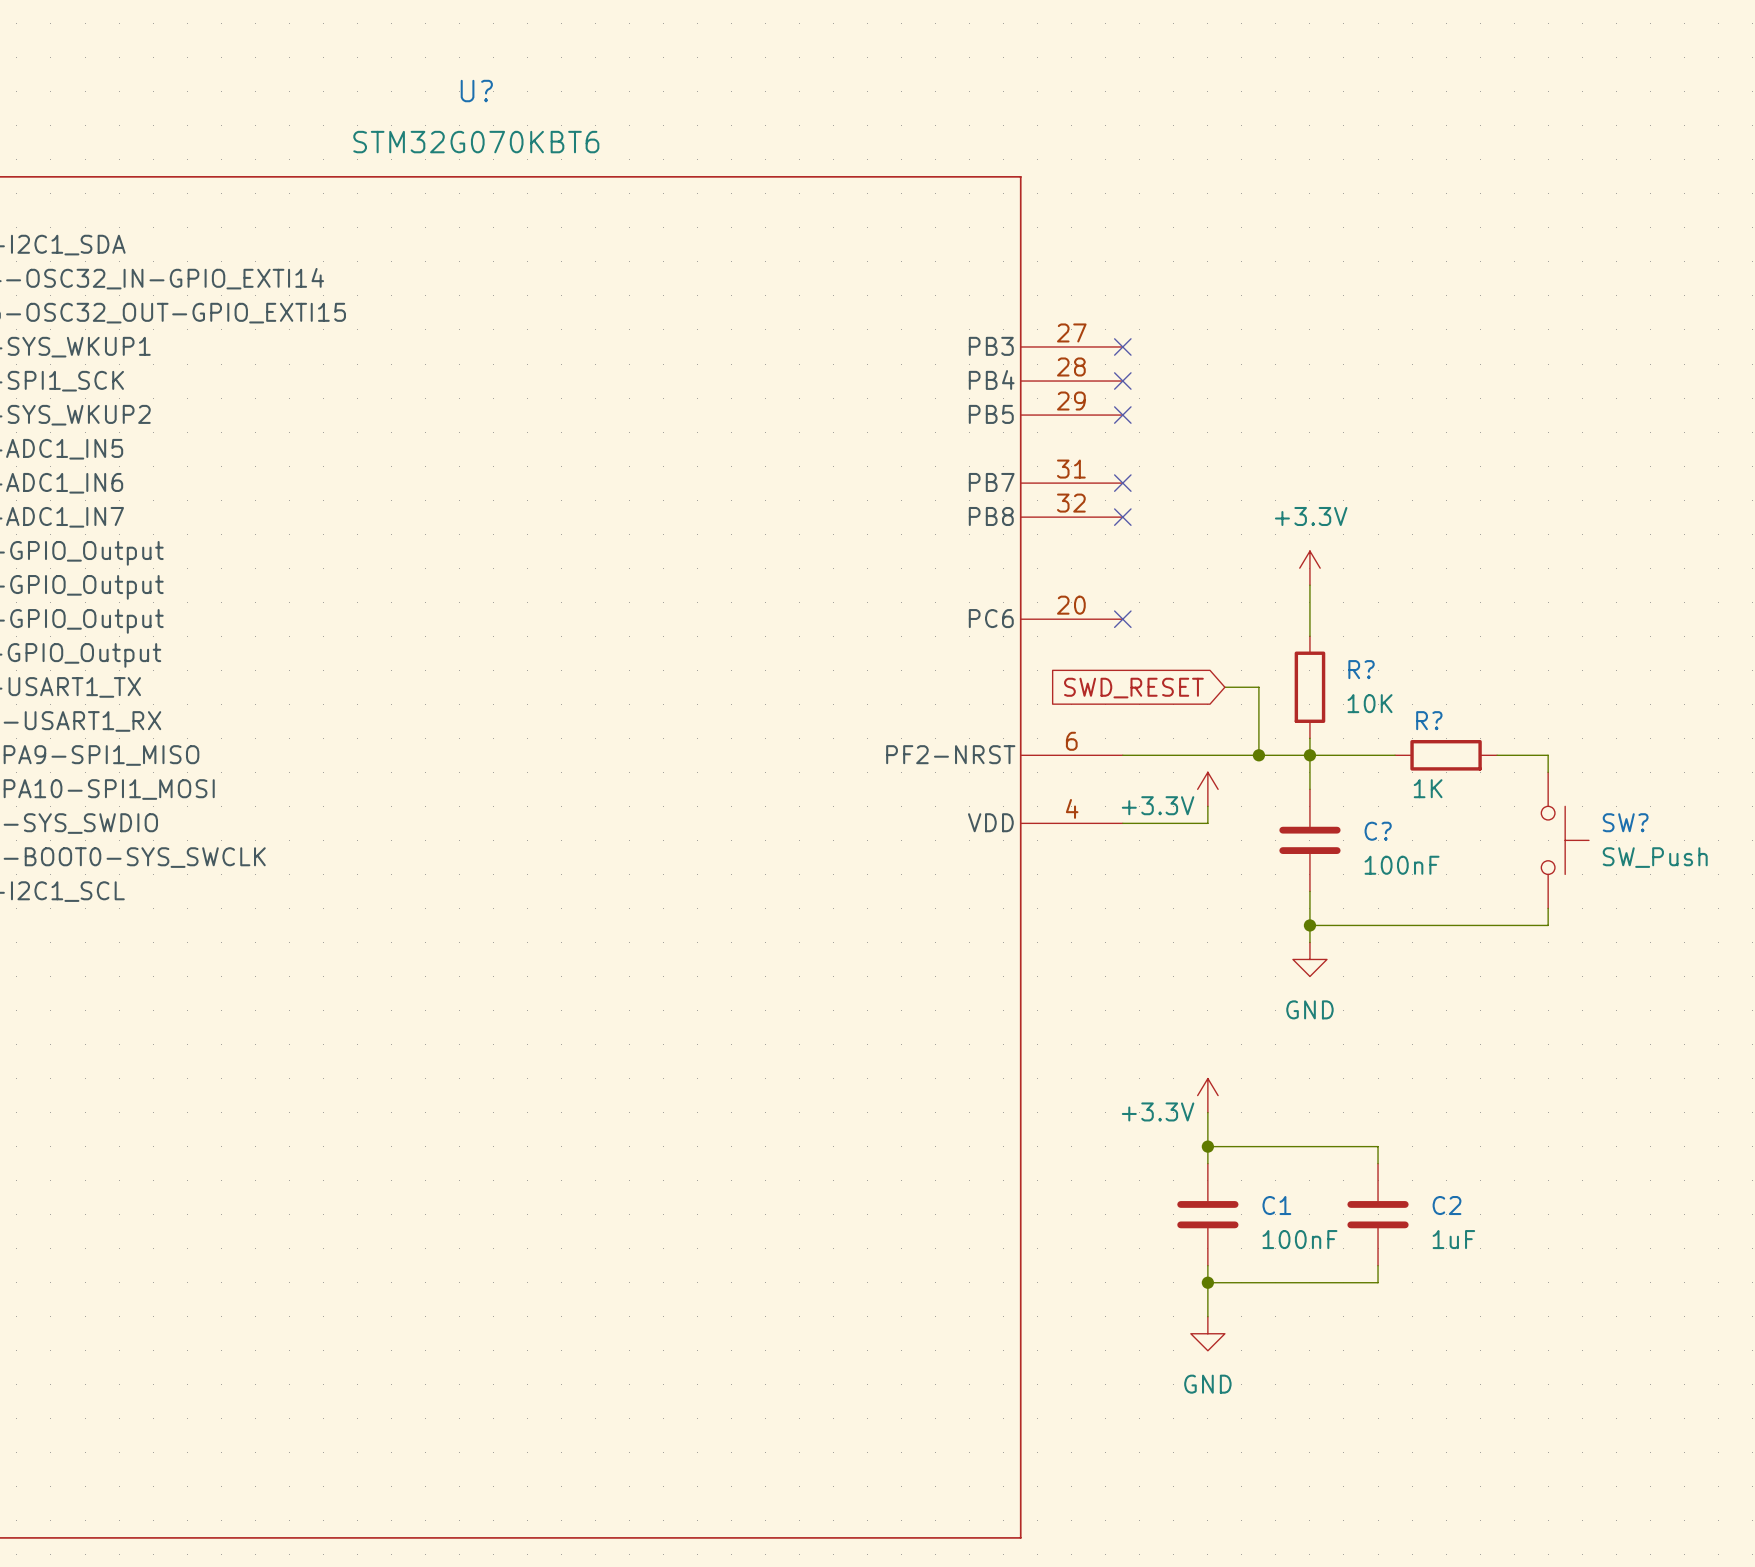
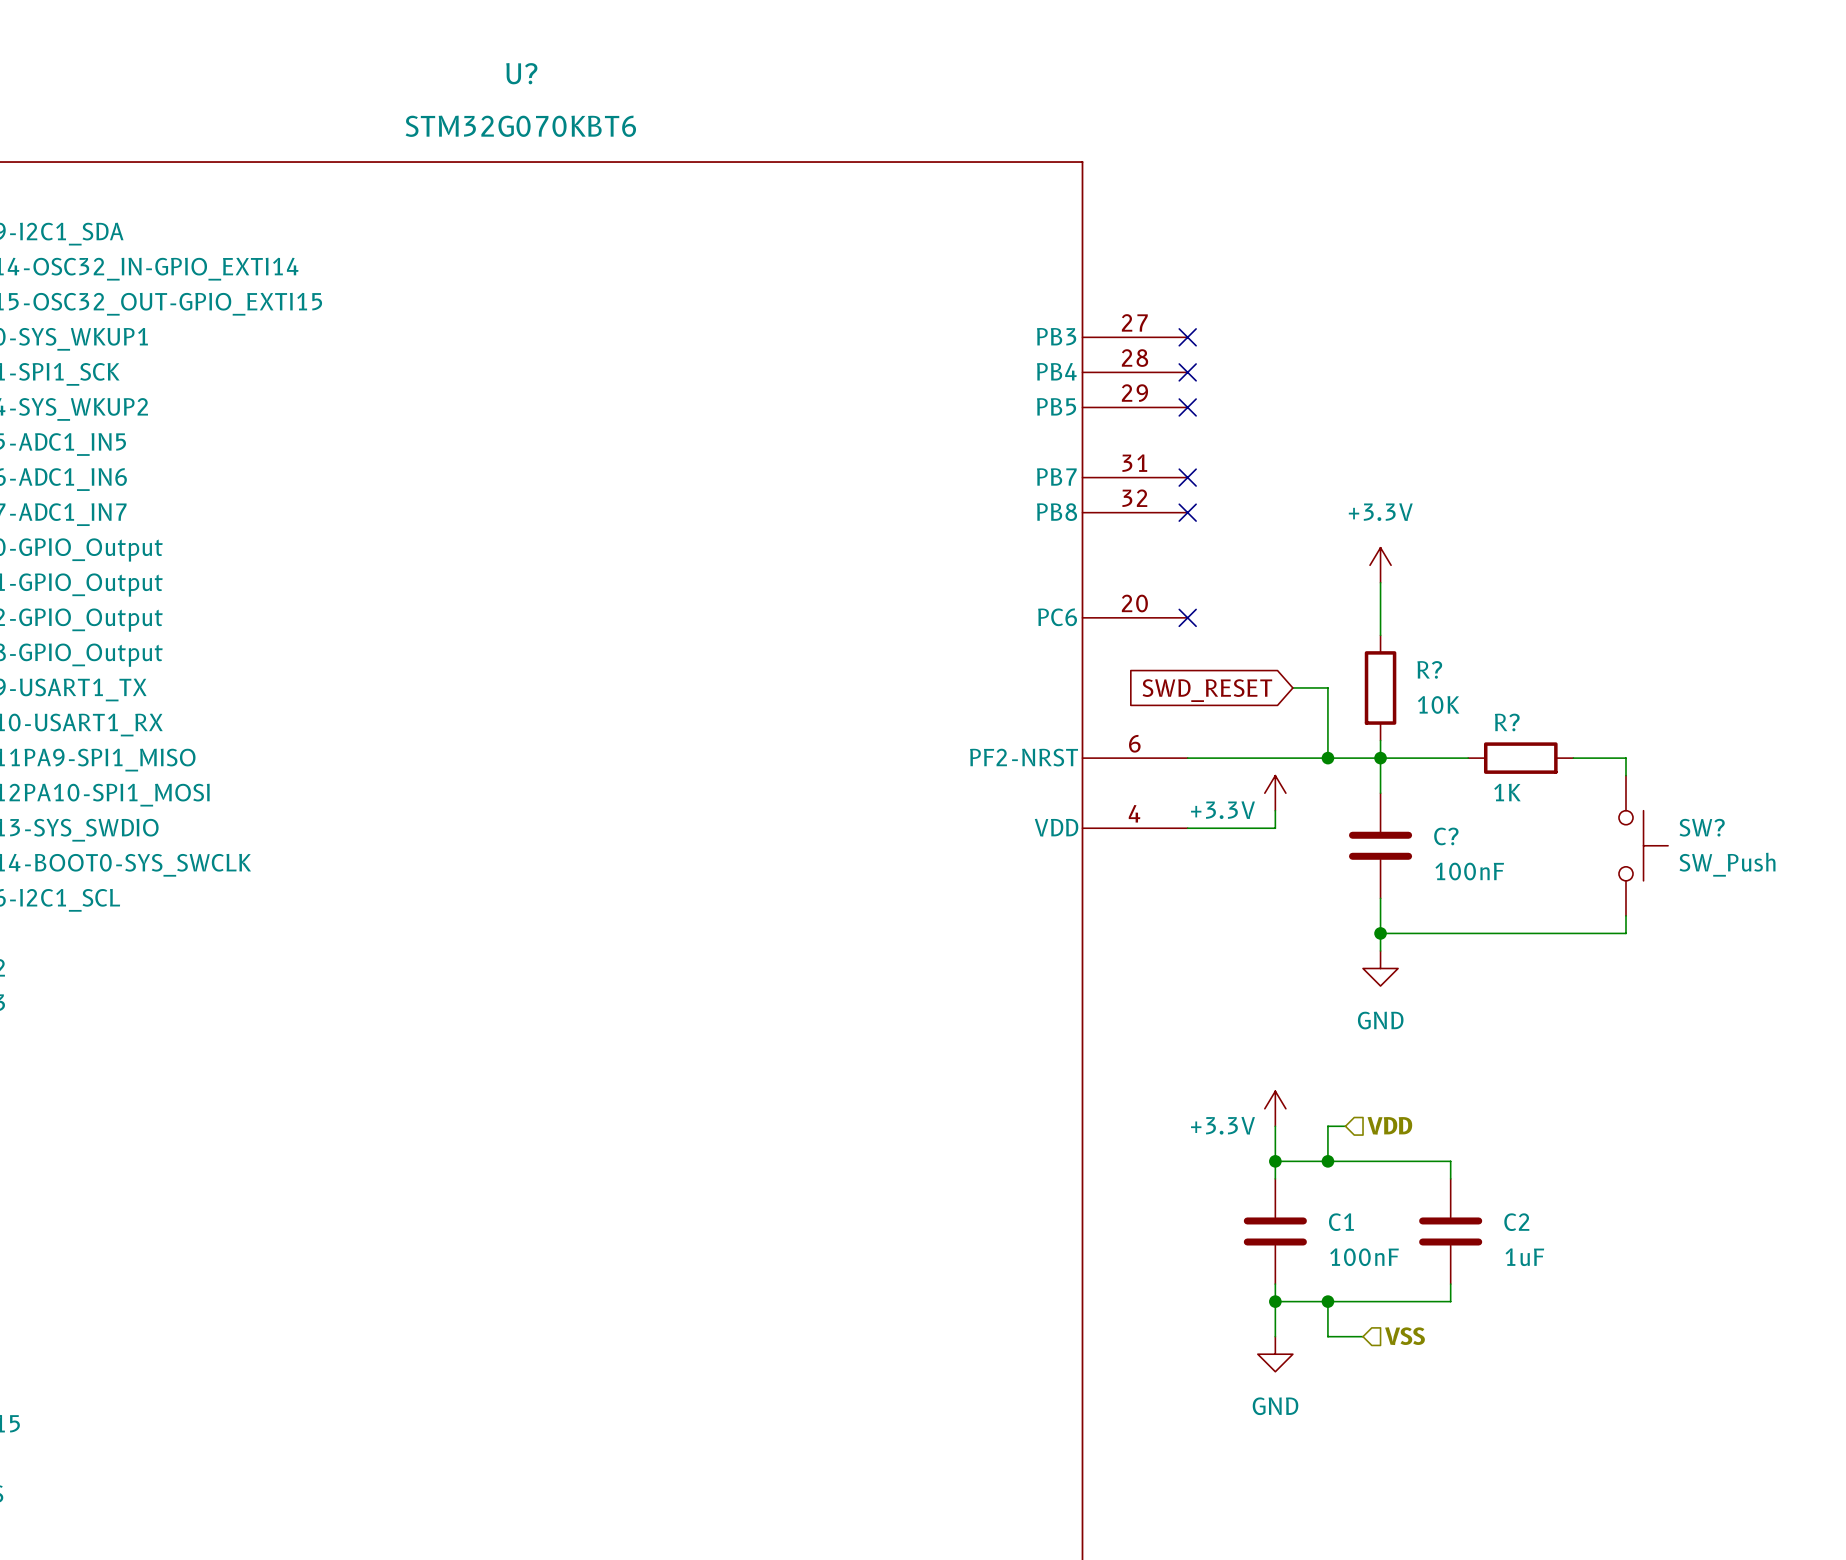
hierarchical label: none -> VDD (1389, 1125)
wire: none -> (1345, 1126) (1327, 1126) (1327, 1161)
junction: none -> (1327, 1161)
wire: none -> (1327, 1301) (1327, 1336) (1363, 1336)
junction: none -> (1327, 1301)
hierarchical label: none -> VSS (1404, 1336)

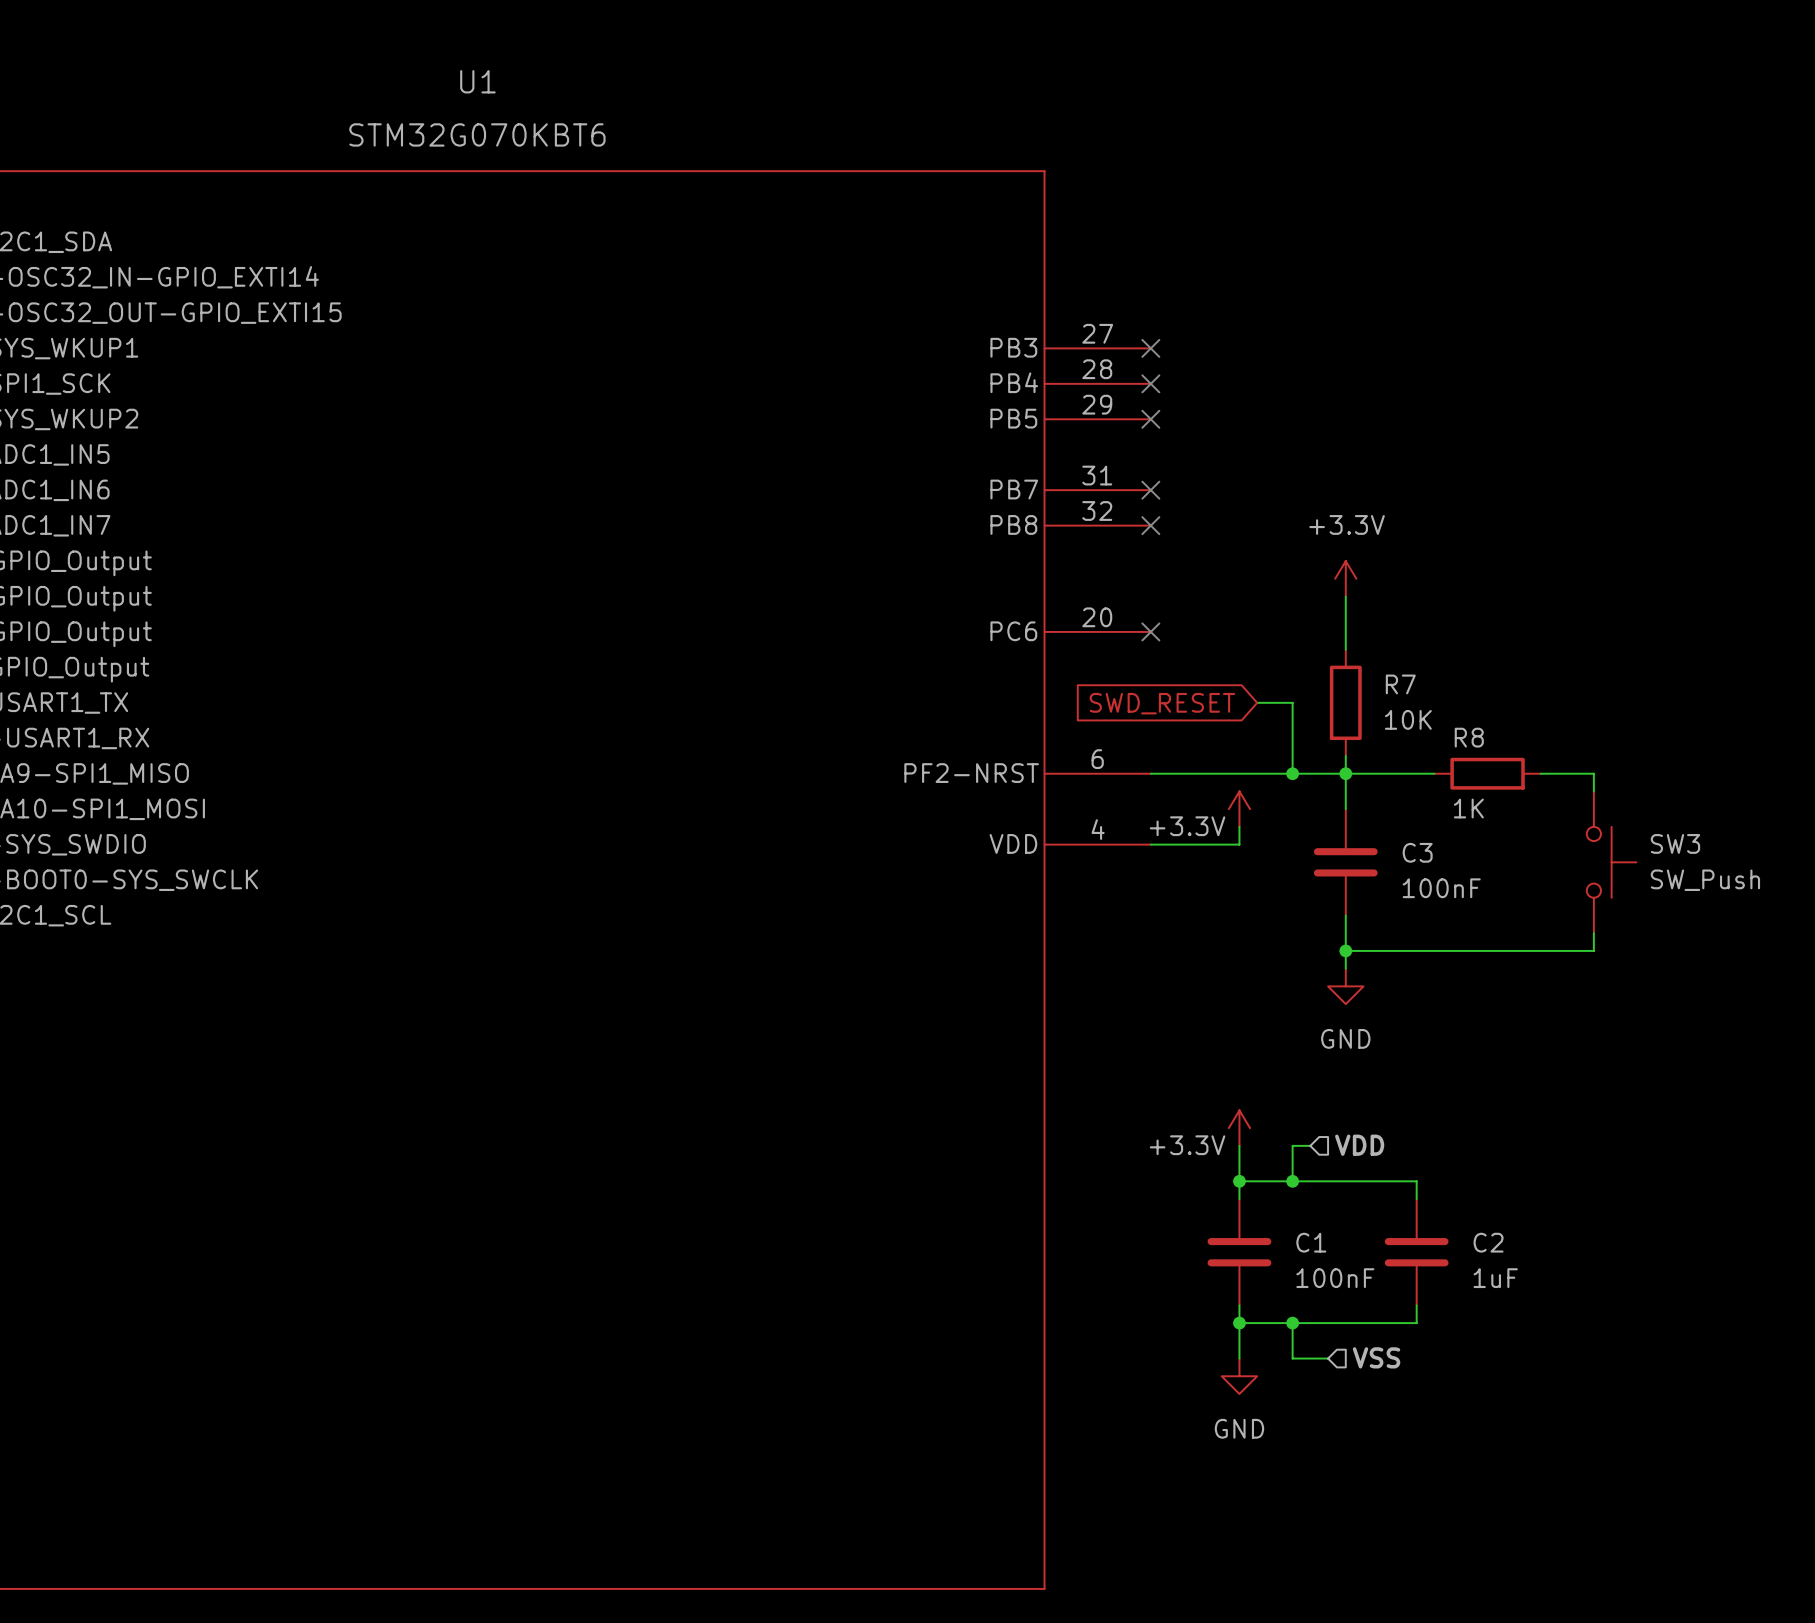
U? name: U? (521, 73) -> U1 (477, 81)
R? name: R? (1429, 669) -> R7 (1400, 684)
R? name: R? (1507, 722) -> R8 (1469, 737)
SW? name: SW? (1702, 827) -> SW3 (1675, 843)
C? name: C? (1446, 836) -> C3 (1417, 852)

